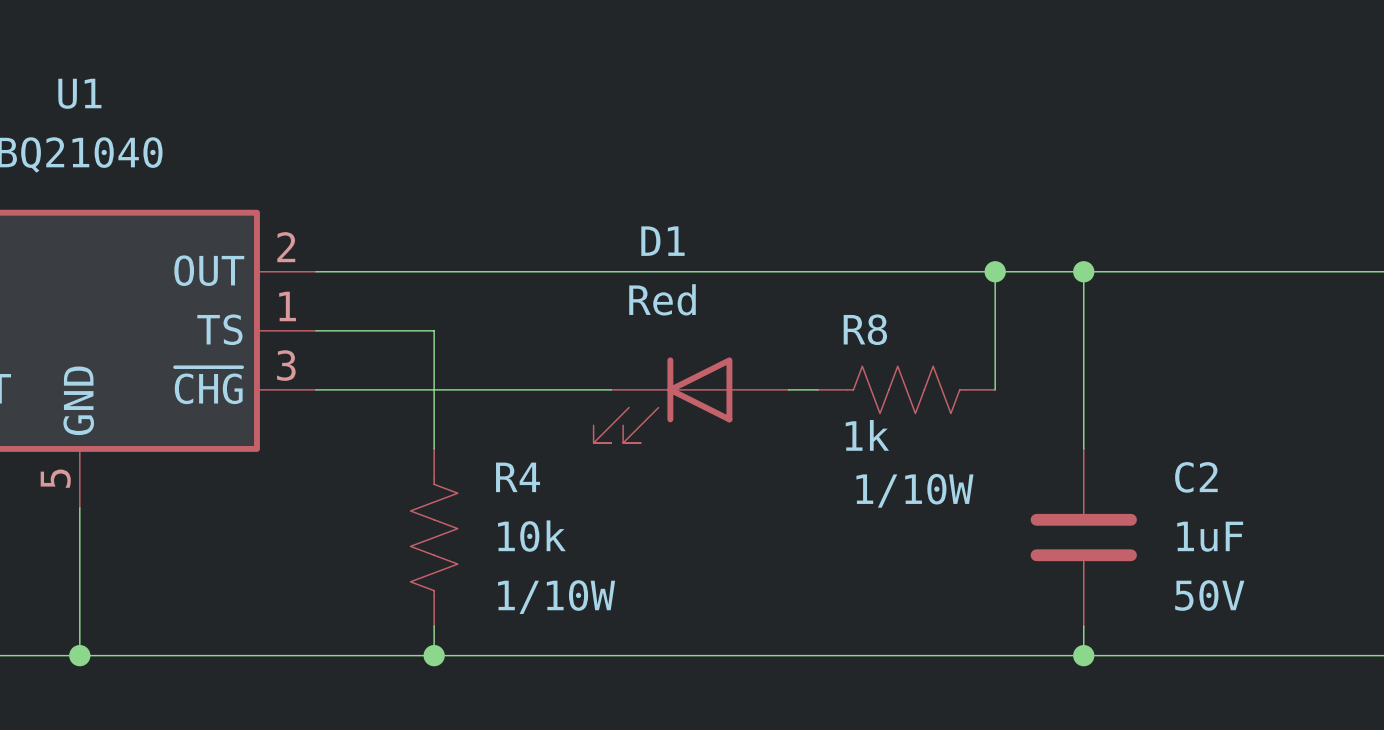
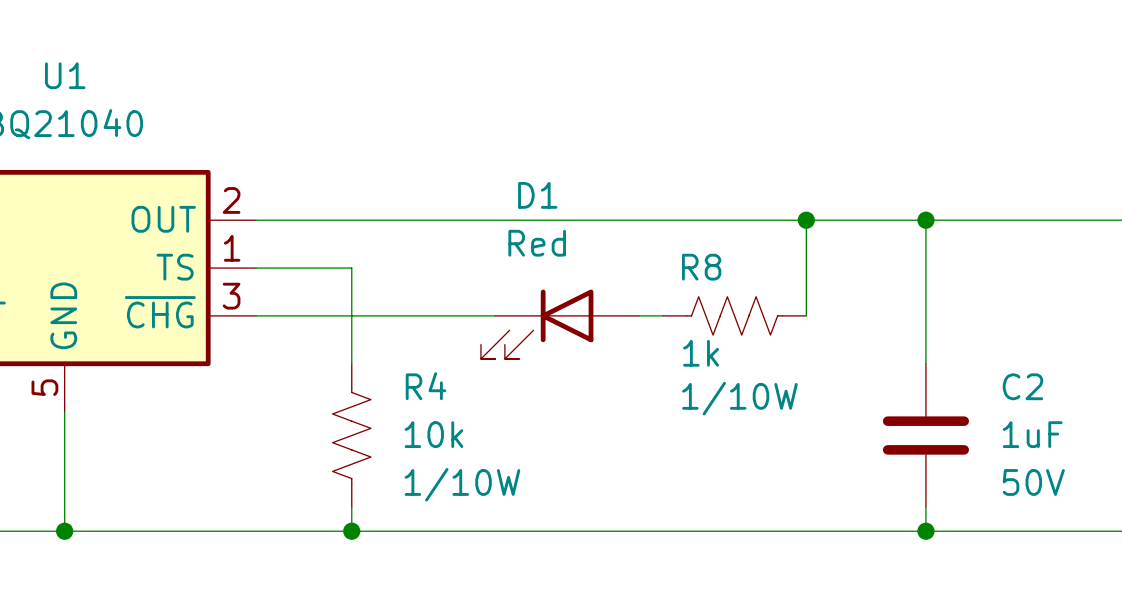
wire: (1083, 271) (1083, 448) -> (925, 220) (925, 363)
junction position: (1083, 271) -> (925, 220)
C2 position: (1083, 537) -> (925, 435)
wire: (1083, 626) (1083, 655) -> (925, 507) (925, 531)
junction position: (1083, 655) -> (925, 531)

